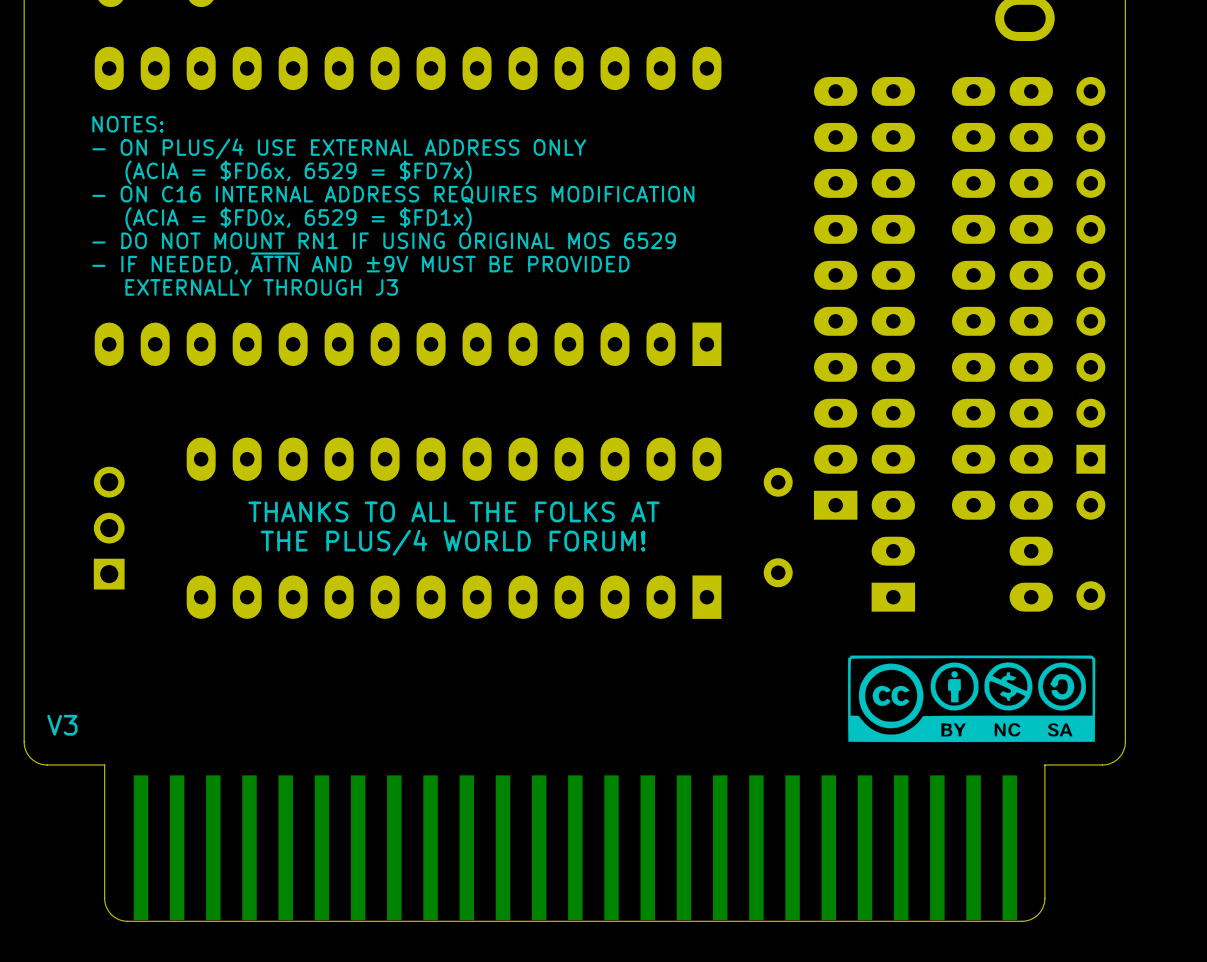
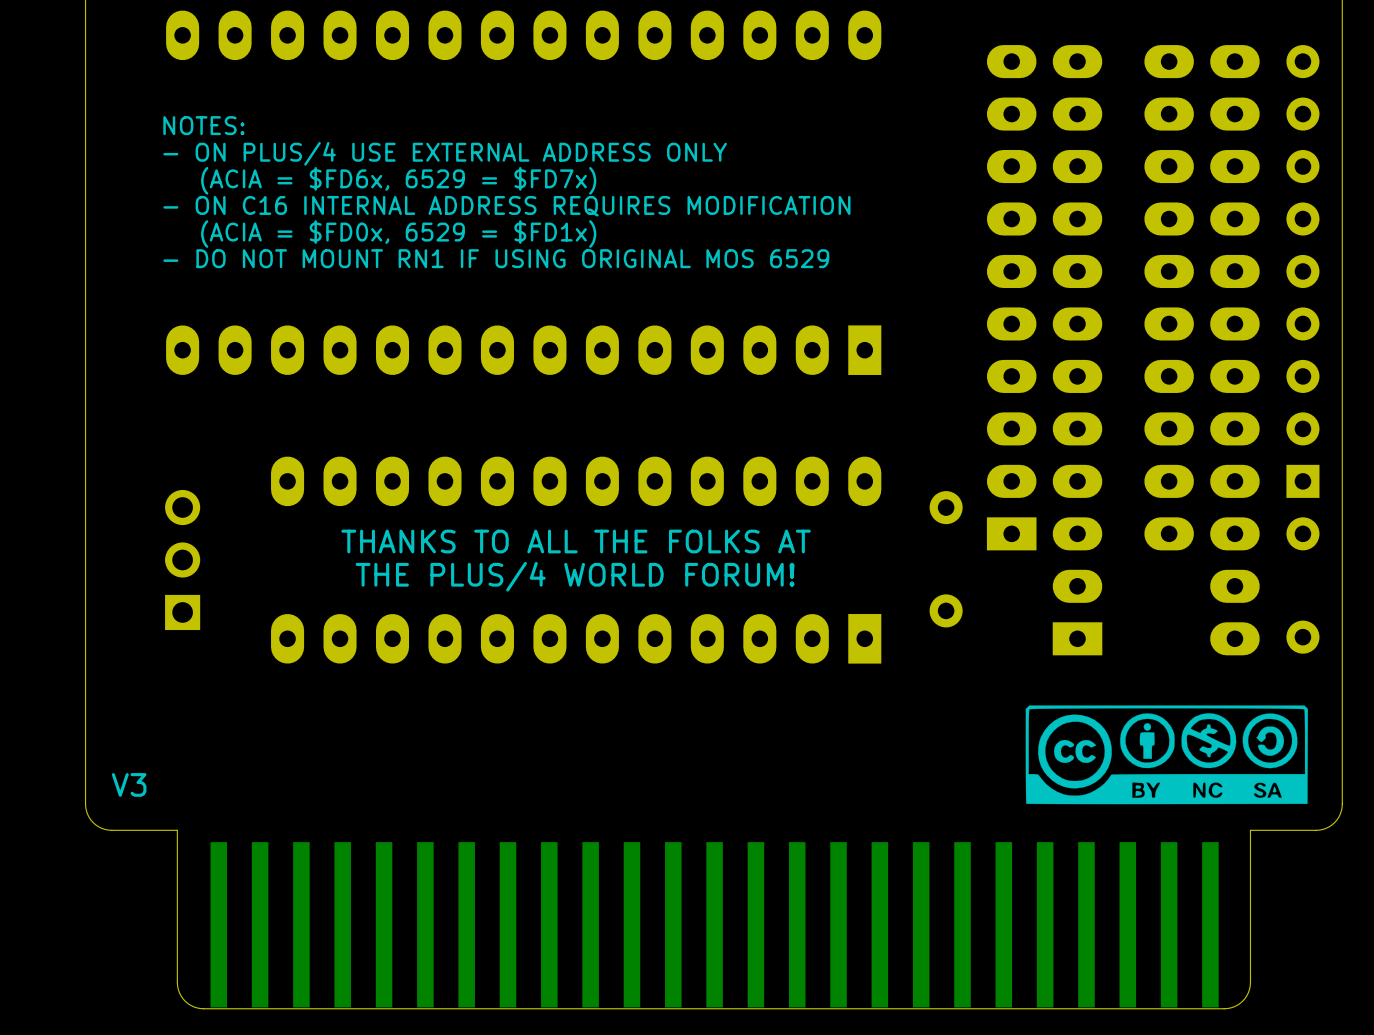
text: NOTES: (127, 124) -> none
text: - ON PLUS/4 USE EXTERNAL ADDRESS ONLY (339, 148) -> NOTES: (203, 125)
text: (ACIA = $FD6x, 6529 = $FD7x) (298, 172) -> - ON PLUS/4 USE EXTERNAL ADDRESS ONLY (445, 153)
text: - ON C16 INTERNAL ADDRESS REQUIRES MODIFICATION (393, 194) -> (ACIA = $FD6x, 6529 = $FD7x) (398, 180)
text: (ACIA = $FD0x, 6529 = $FD1x) (298, 219) -> - ON C16 INTERNAL ADDRESS REQUIRES MODIFICATION (506, 206)
text: - DO NOT MOUNT RN1 IF USING ORIGINAL MOS 6529 (384, 240) -> (ACIA = $FD0x, 6529 = $FD1x) (398, 234)
text: - IF NEEDED, ~{ATTN} AND ±9V MUST BE PROVIDED (360, 263) -> - DO NOT MOUNT RN1 IF USING ORIGINAL MOS 6529 (496, 258)
text: EXTERNALLY THROUGH J3 (261, 287) -> none

